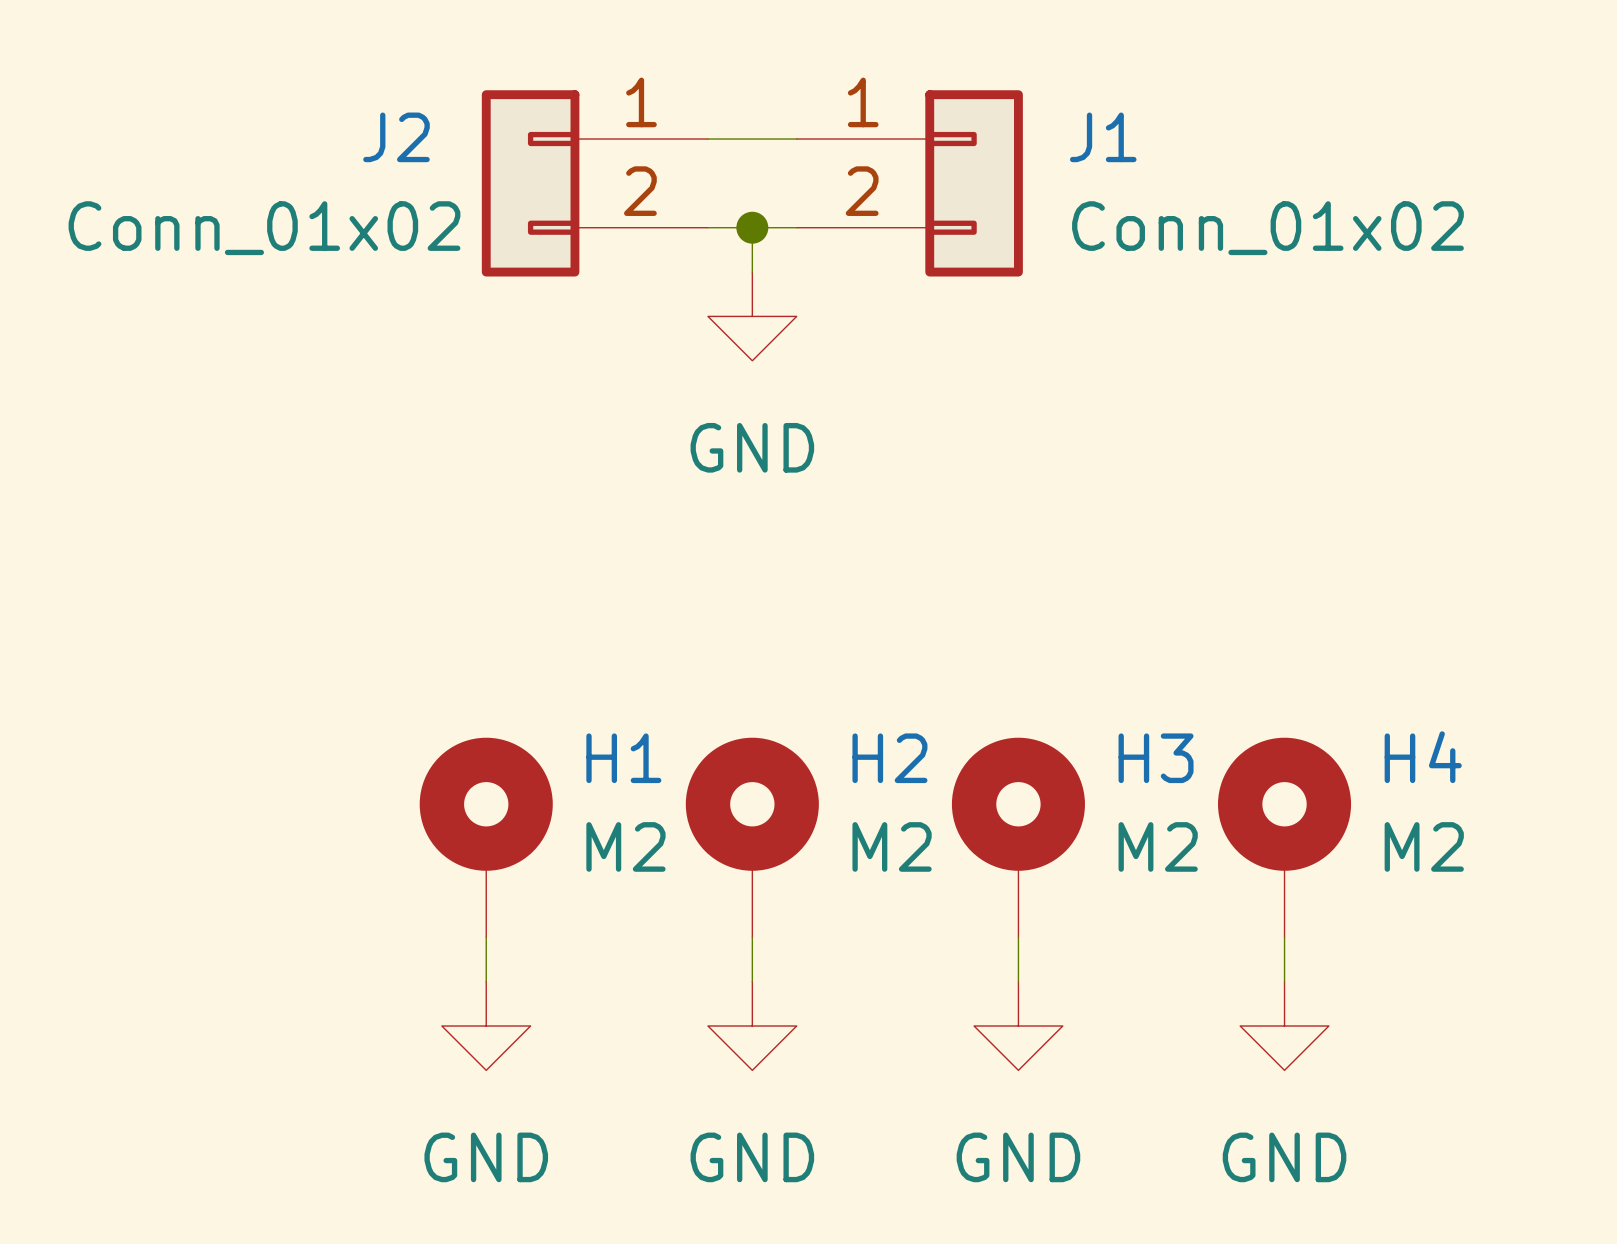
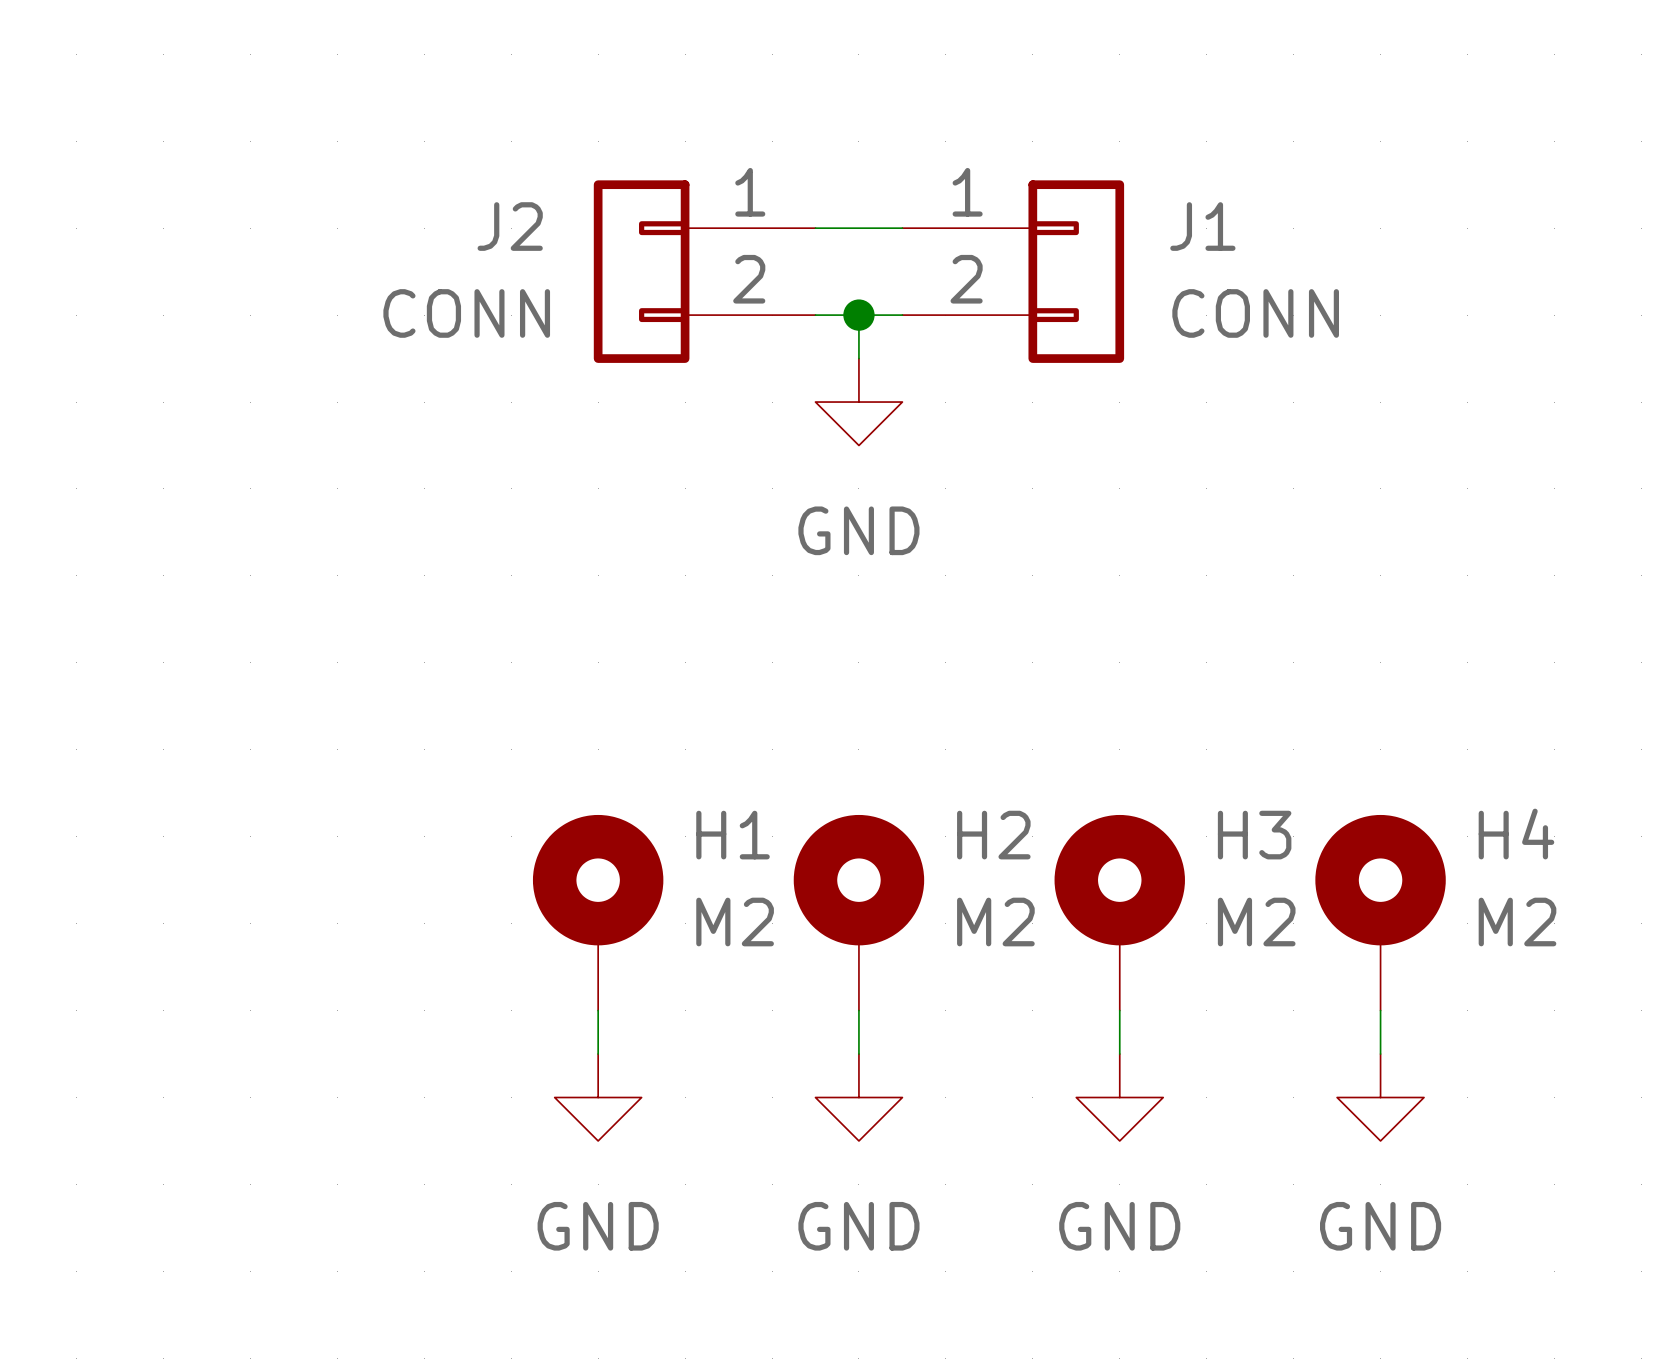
J2 value: Conn_01x02 (264, 228) -> CONN (466, 313)
J1 value: Conn_01x02 (1267, 228) -> CONN (1255, 313)

